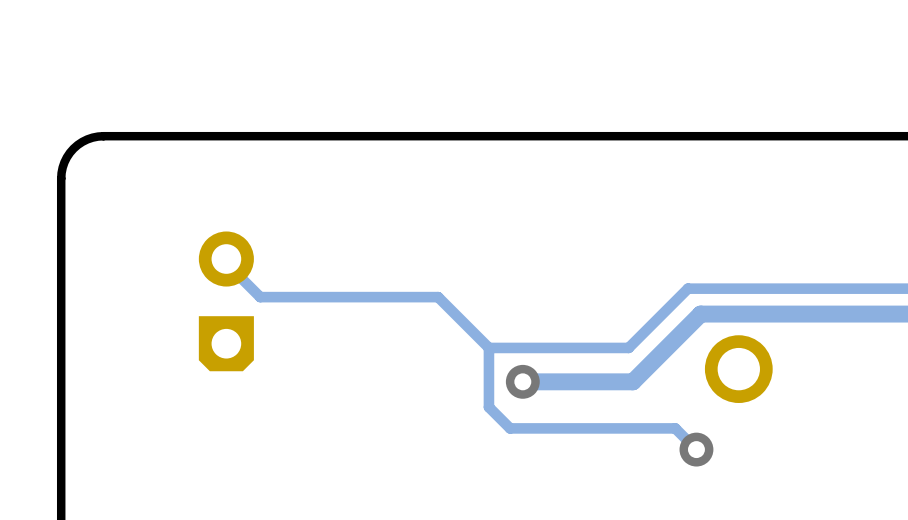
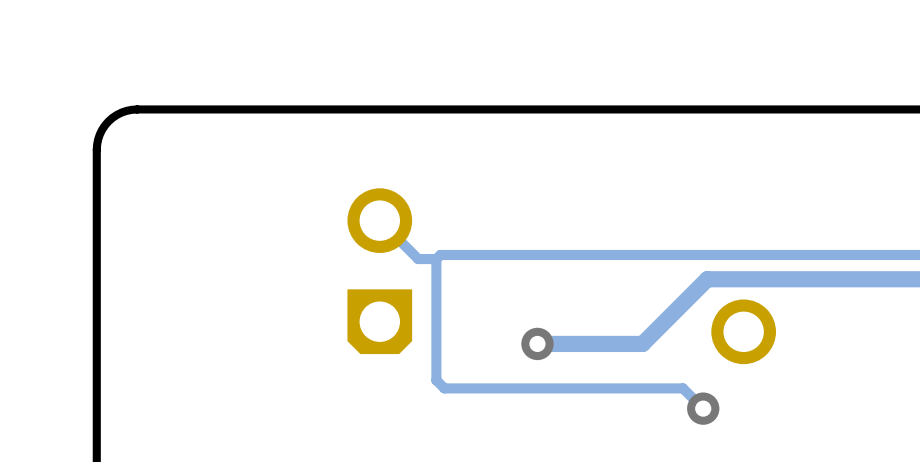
track: none -> (379, 220) (418, 259) (436, 259)
track: (226, 263) (260, 297) (438, 297) (488, 347) -> none
track: (687, 288) (628, 347) (488, 347) -> (695, 255) (440, 255) (436, 259)
part: (226, 301) -> none
part: none -> (379, 271)
track: (488, 347) (488, 407) (510, 428) -> (436, 259) (436, 380) (444, 388) (525, 388)

